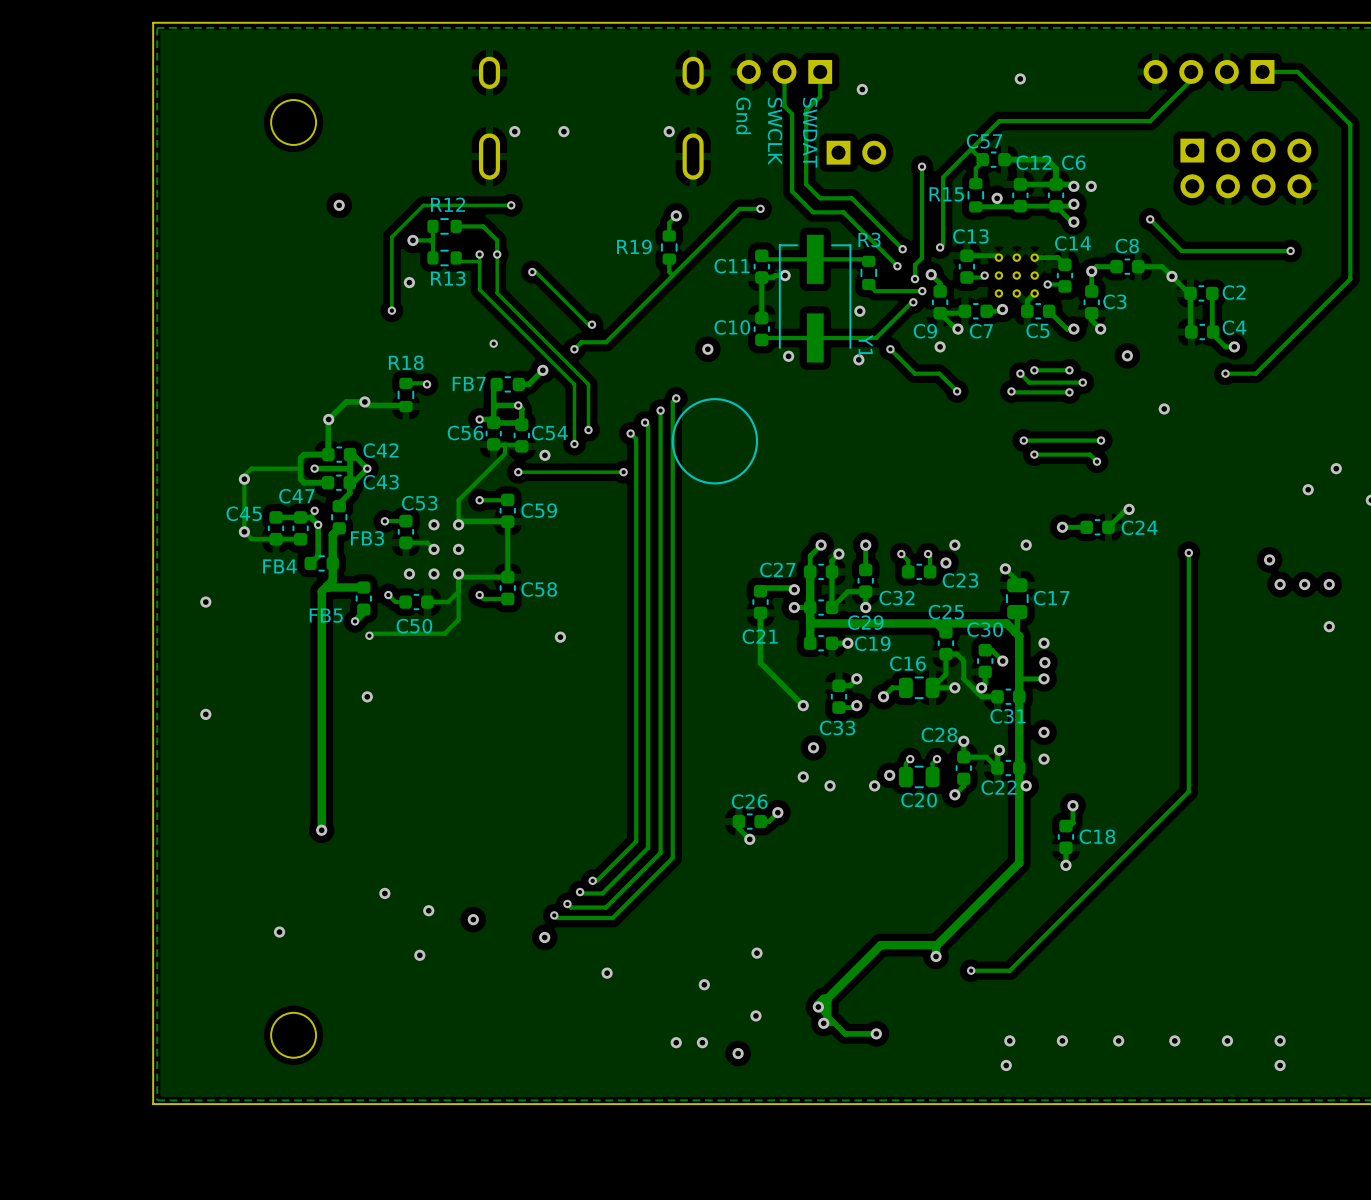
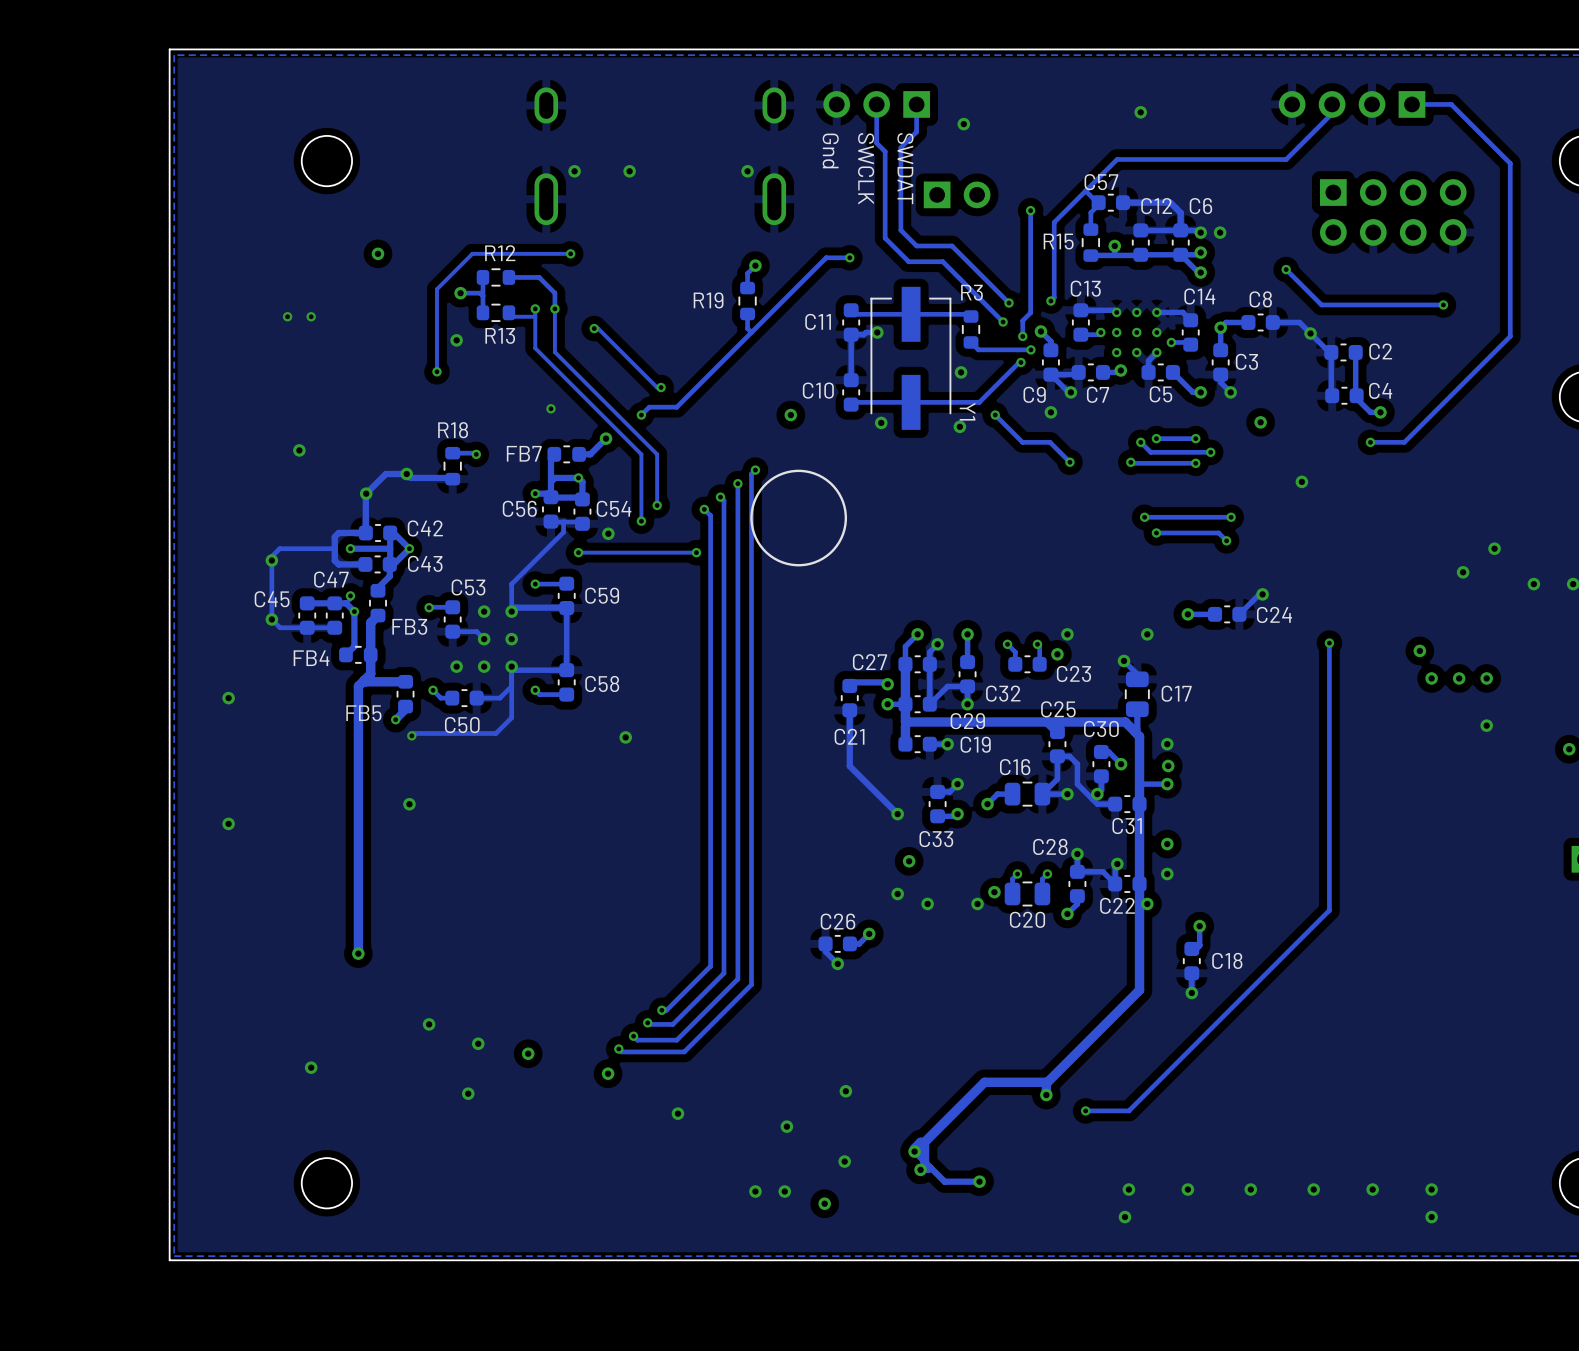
via: none -> (287, 316)
via: none -> (311, 316)
via: none -> (299, 450)

